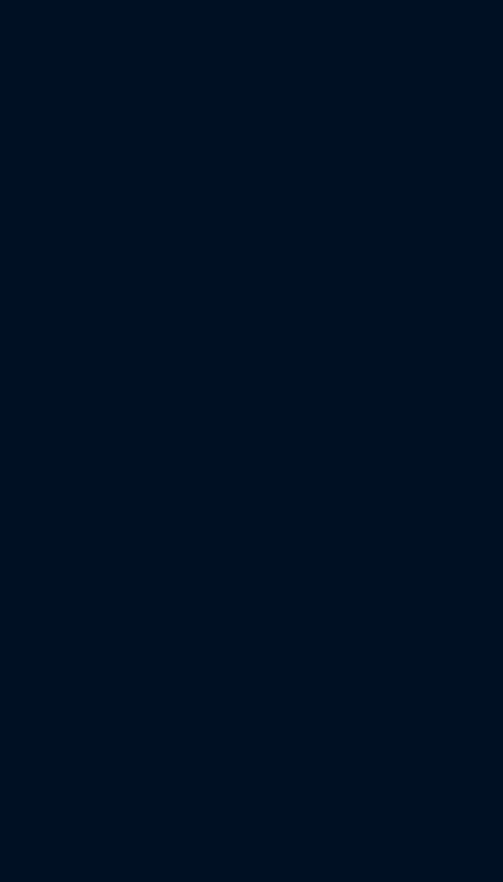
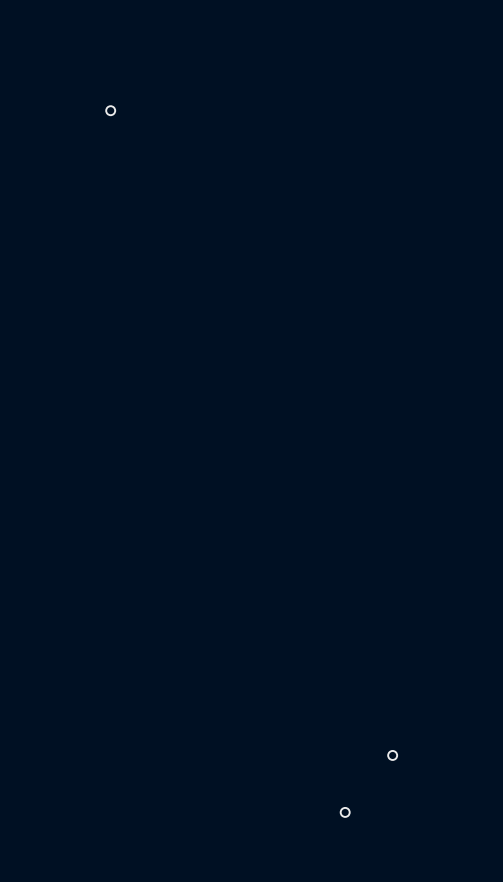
via: none -> (110, 110)
via: none -> (392, 755)
via: none -> (345, 812)

